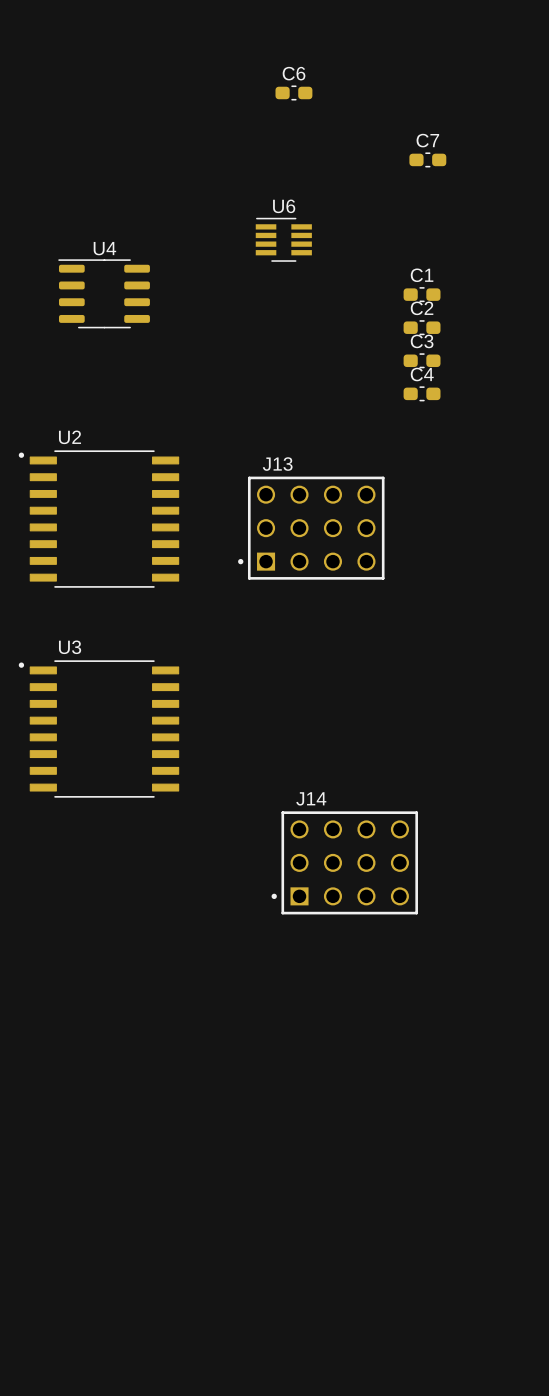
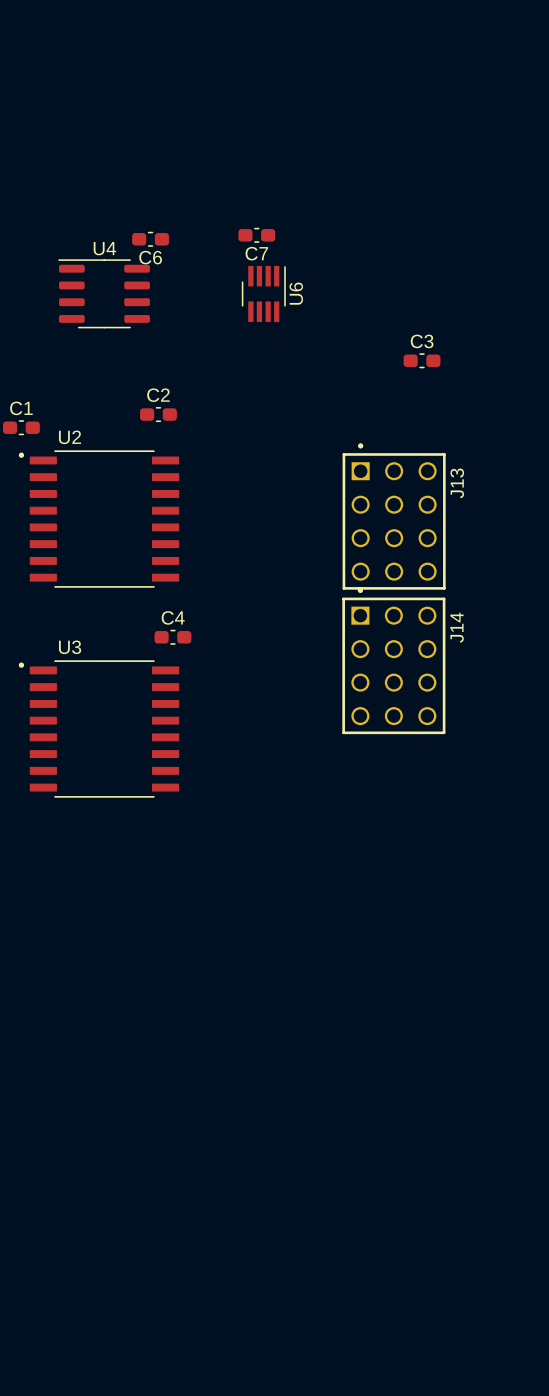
C6 name position: C6 (294, 73) -> C6 (150, 257)
C6 position: (293, 92) -> (150, 239)
C7 name position: C7 (427, 140) -> C7 (256, 253)
C7 position: (427, 159) -> (256, 235)
U6 rotation: 0° (283, 239) -> 90° clockwise (263, 293)
U6 position: (283, 239) -> (263, 293)
C1 position: (422, 294) -> (21, 427)
C2 position: (422, 327) -> (158, 414)
C4 position: (422, 393) -> (172, 637)
J13 rotation: 0° (311, 528) -> 90° clockwise (394, 516)
J14 rotation: 0° (344, 862) -> 90° clockwise (393, 660)
J14 position: (344, 862) -> (393, 660)

